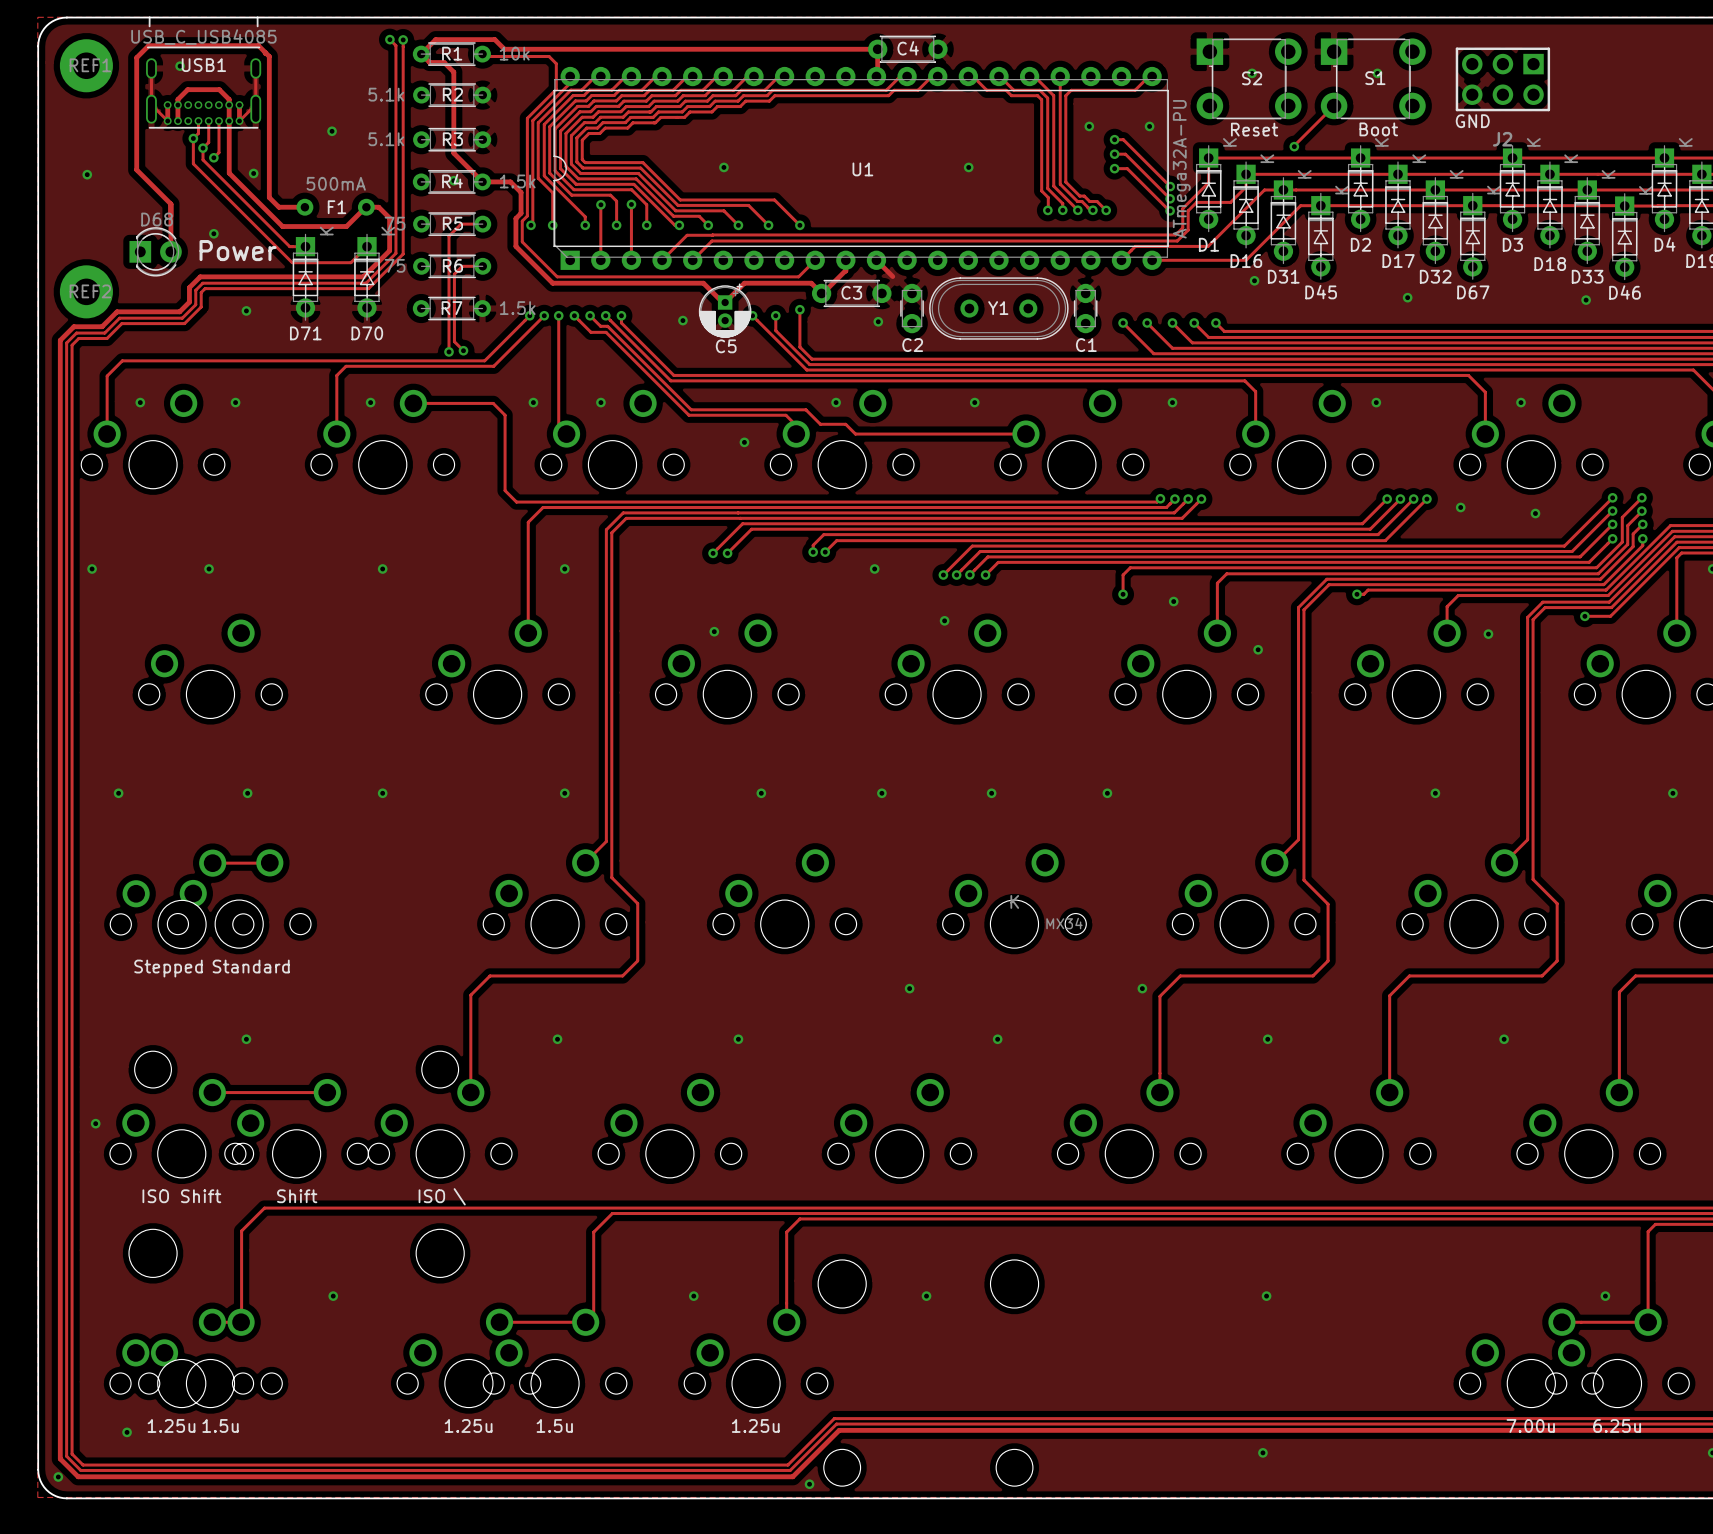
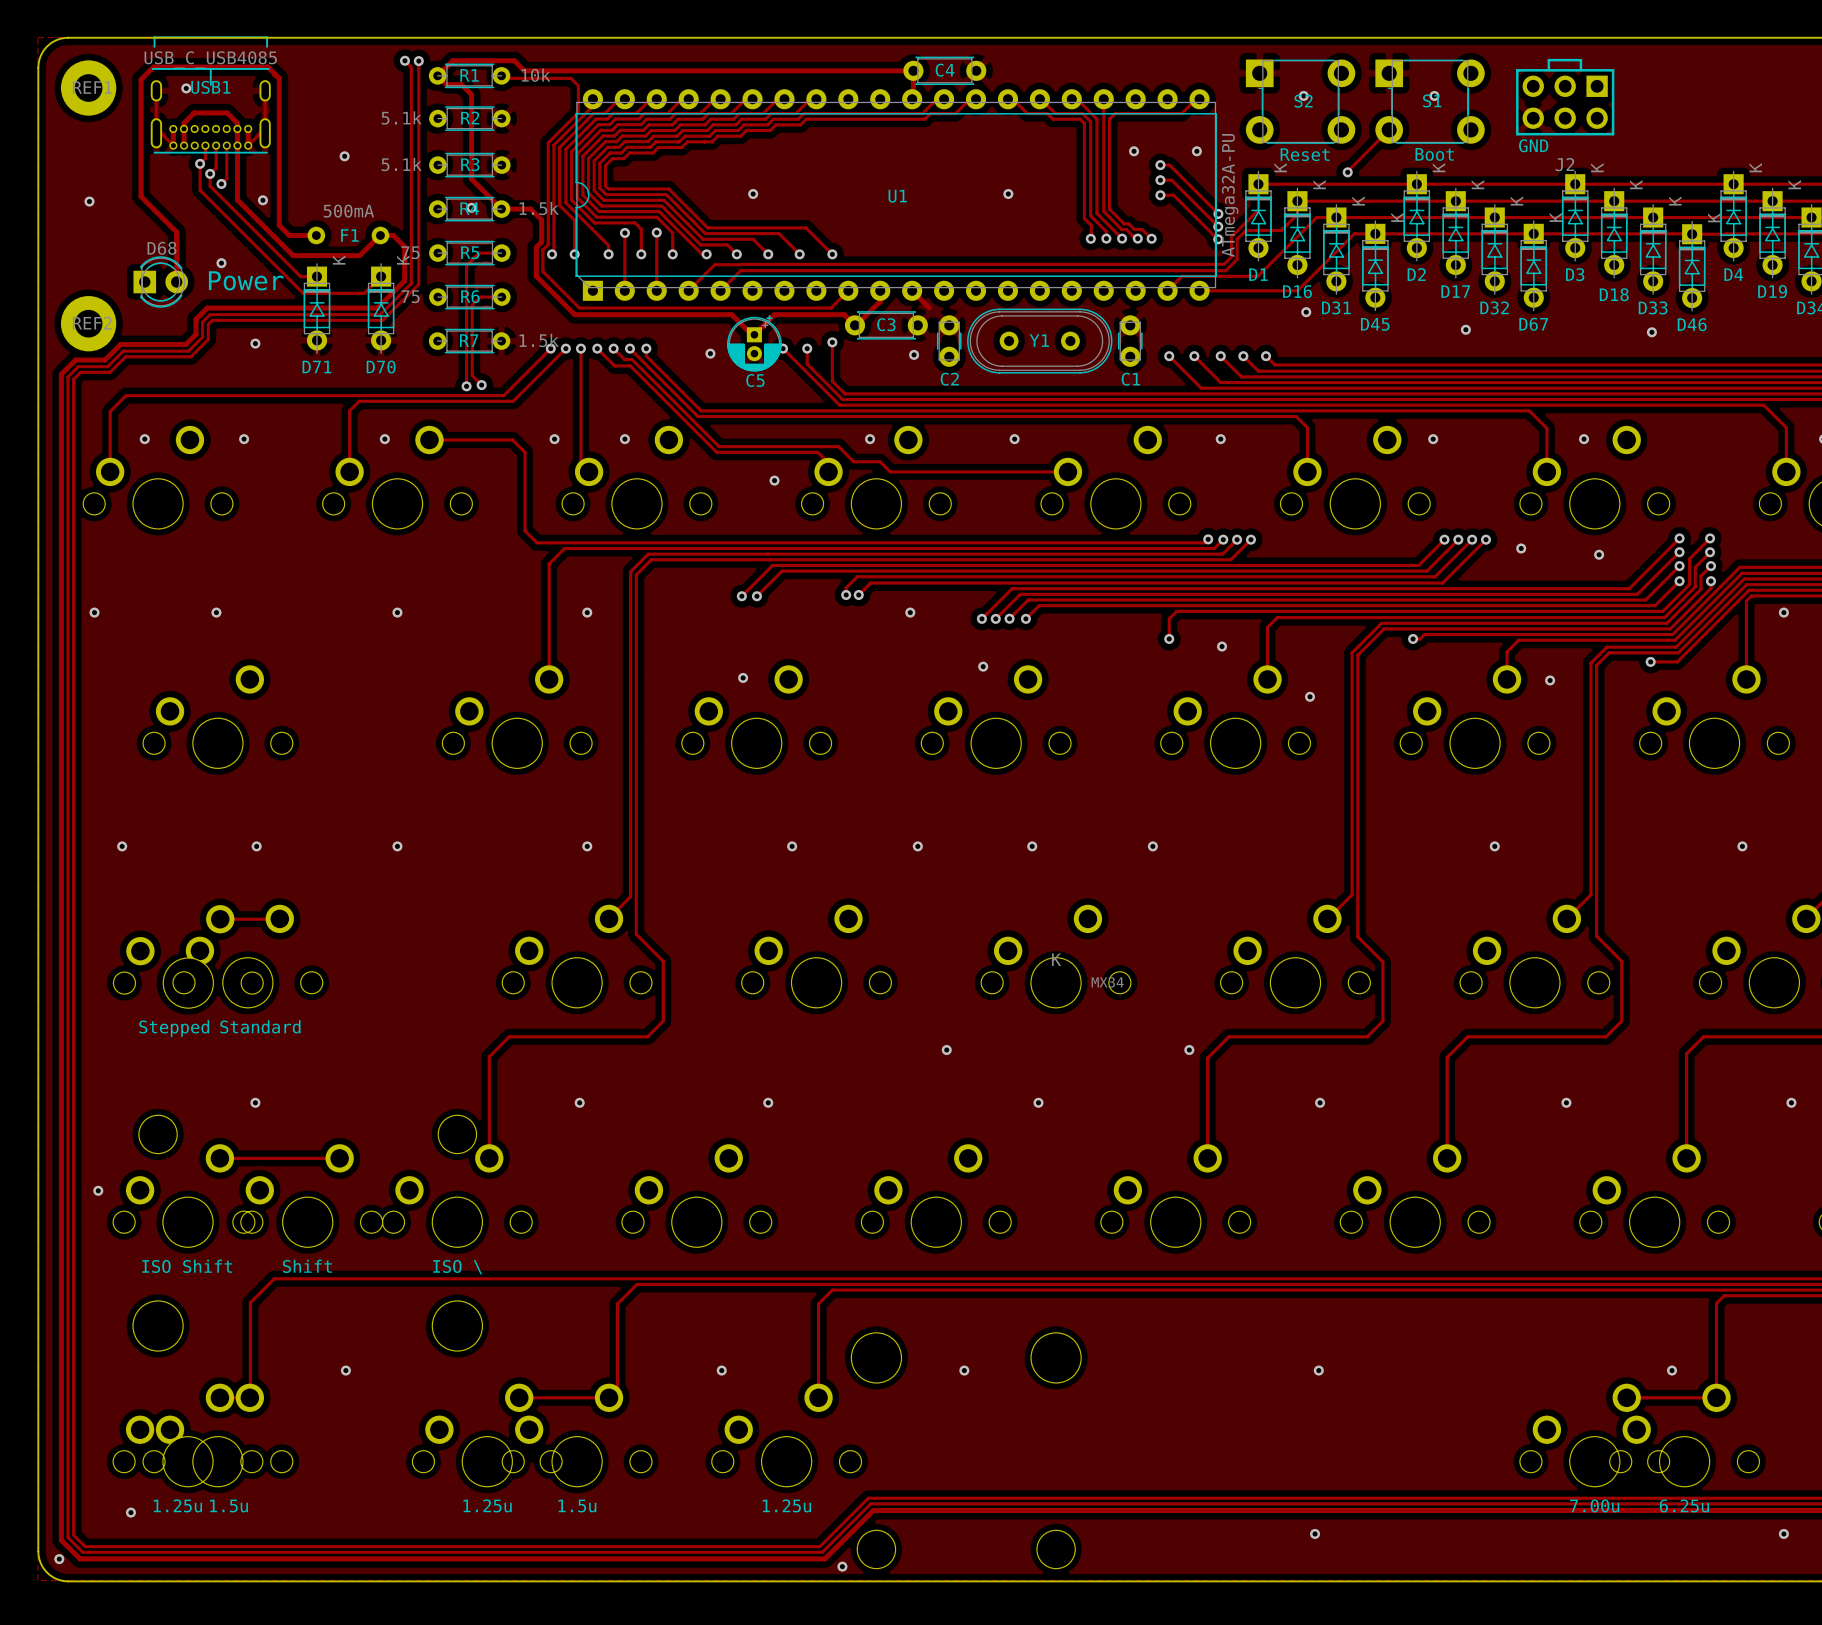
USB1 footprint: [146, 16, 262, 129] -> [150, 36, 271, 154]
J2 footprint: [1455, 47, 1551, 112] -> [1516, 58, 1615, 136]

